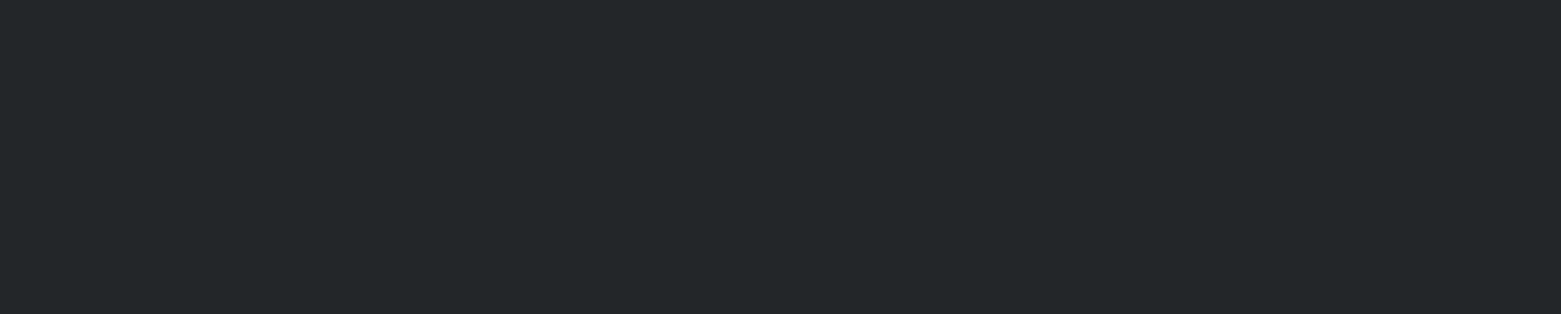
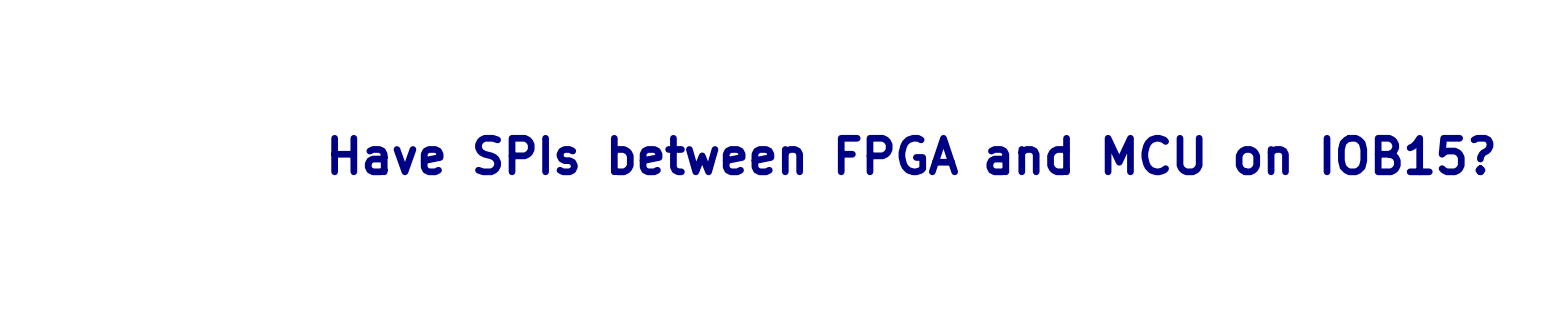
text: none -> Have SPIs between FPGA and MCU on IOB15? (912, 155)

